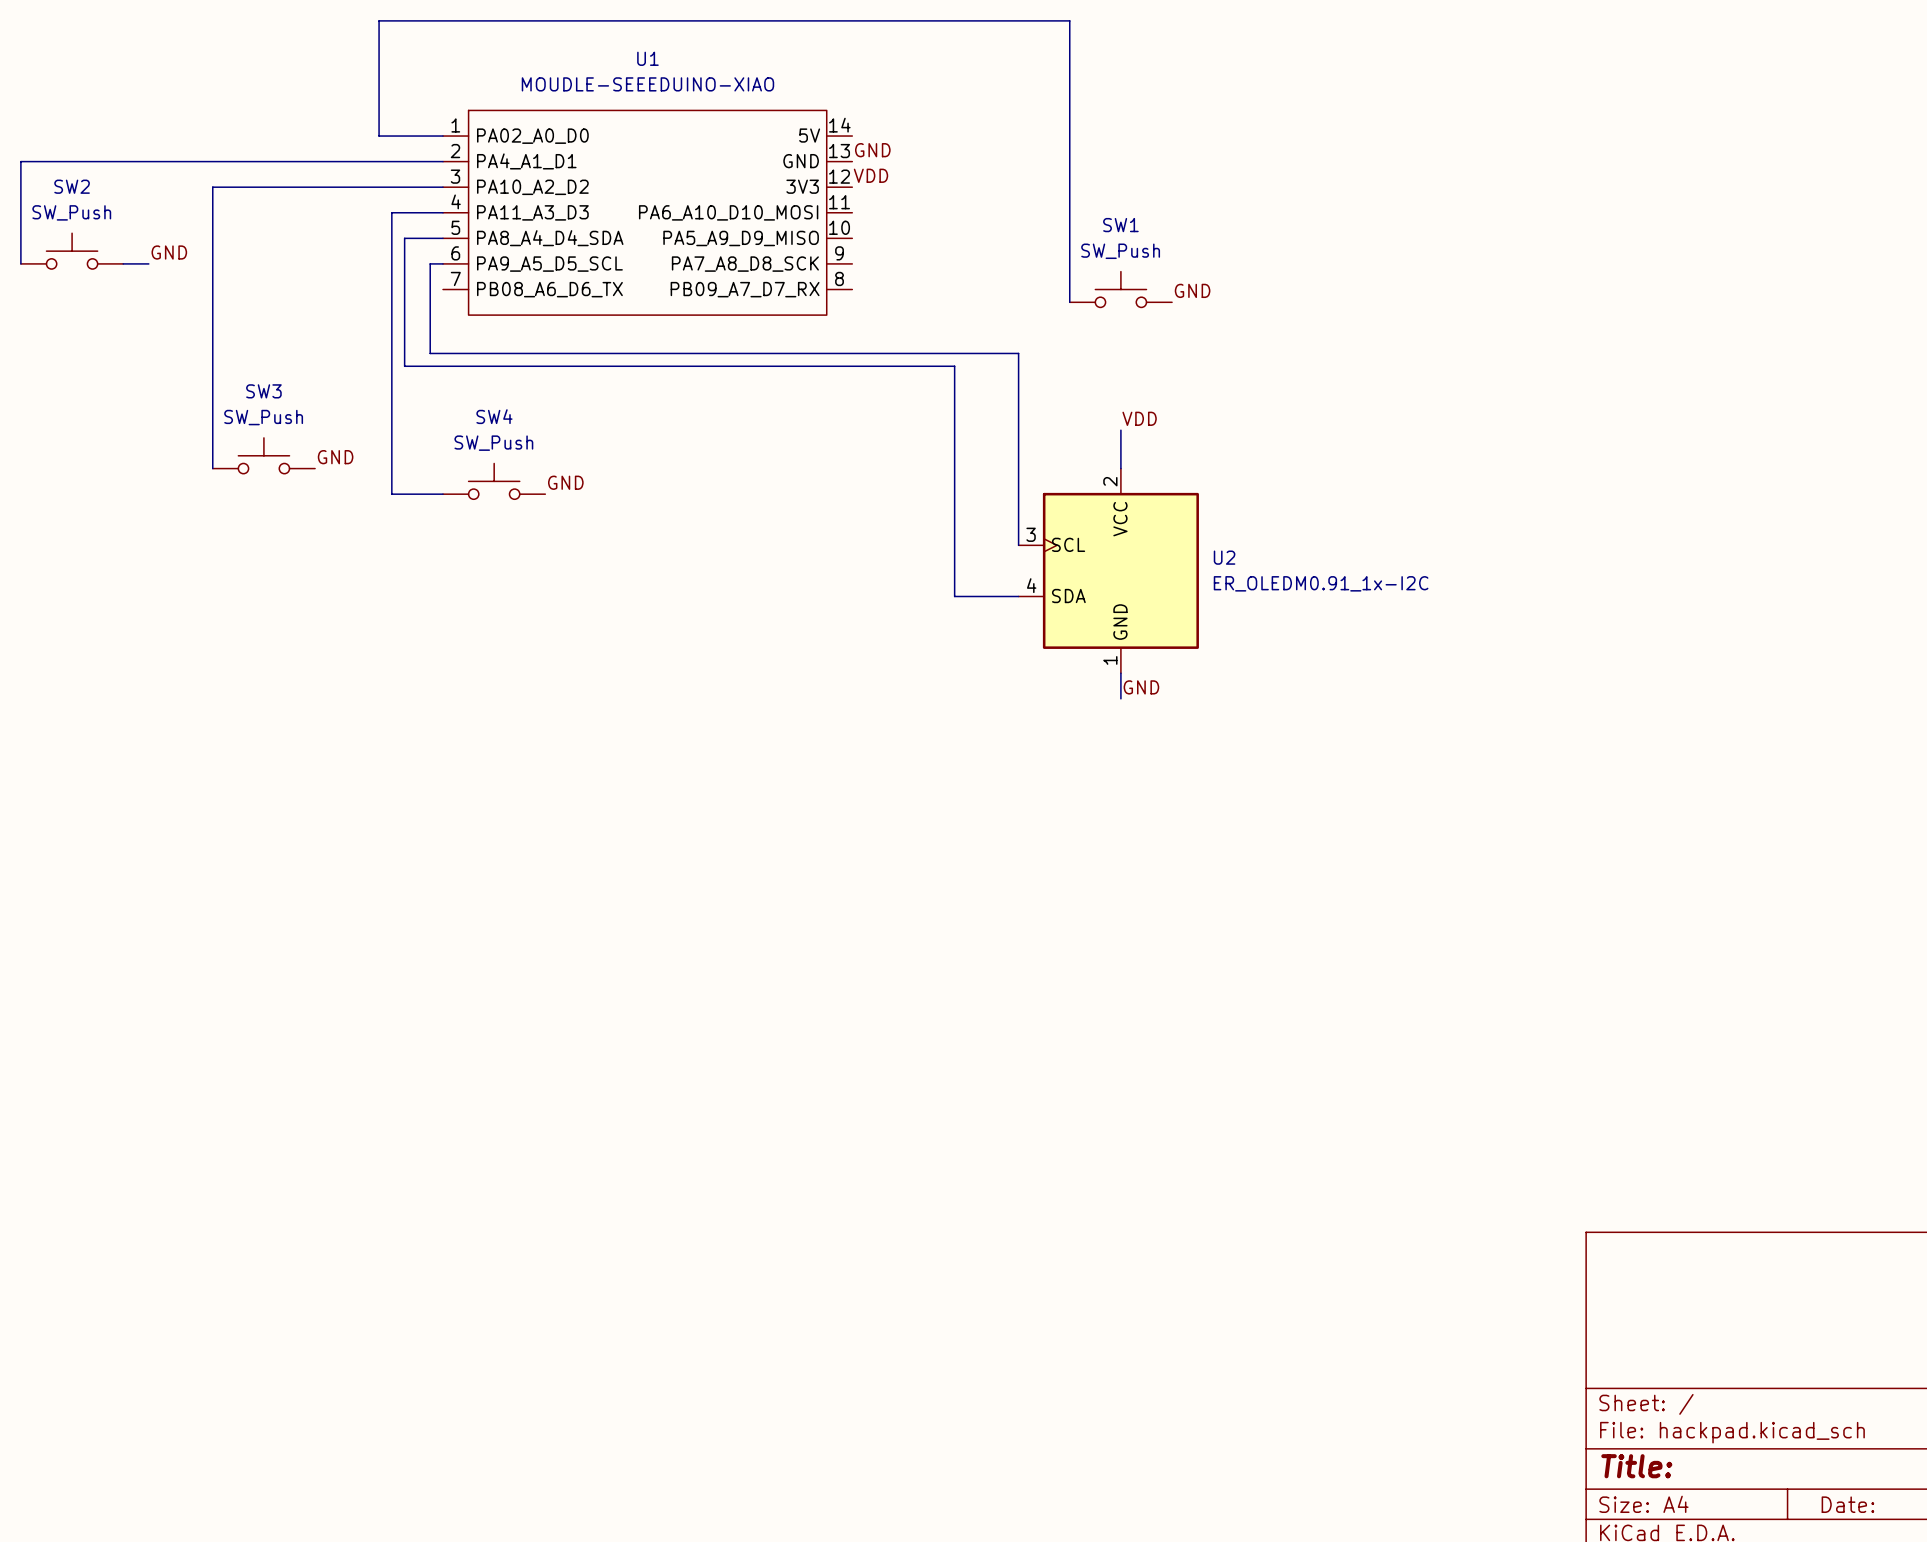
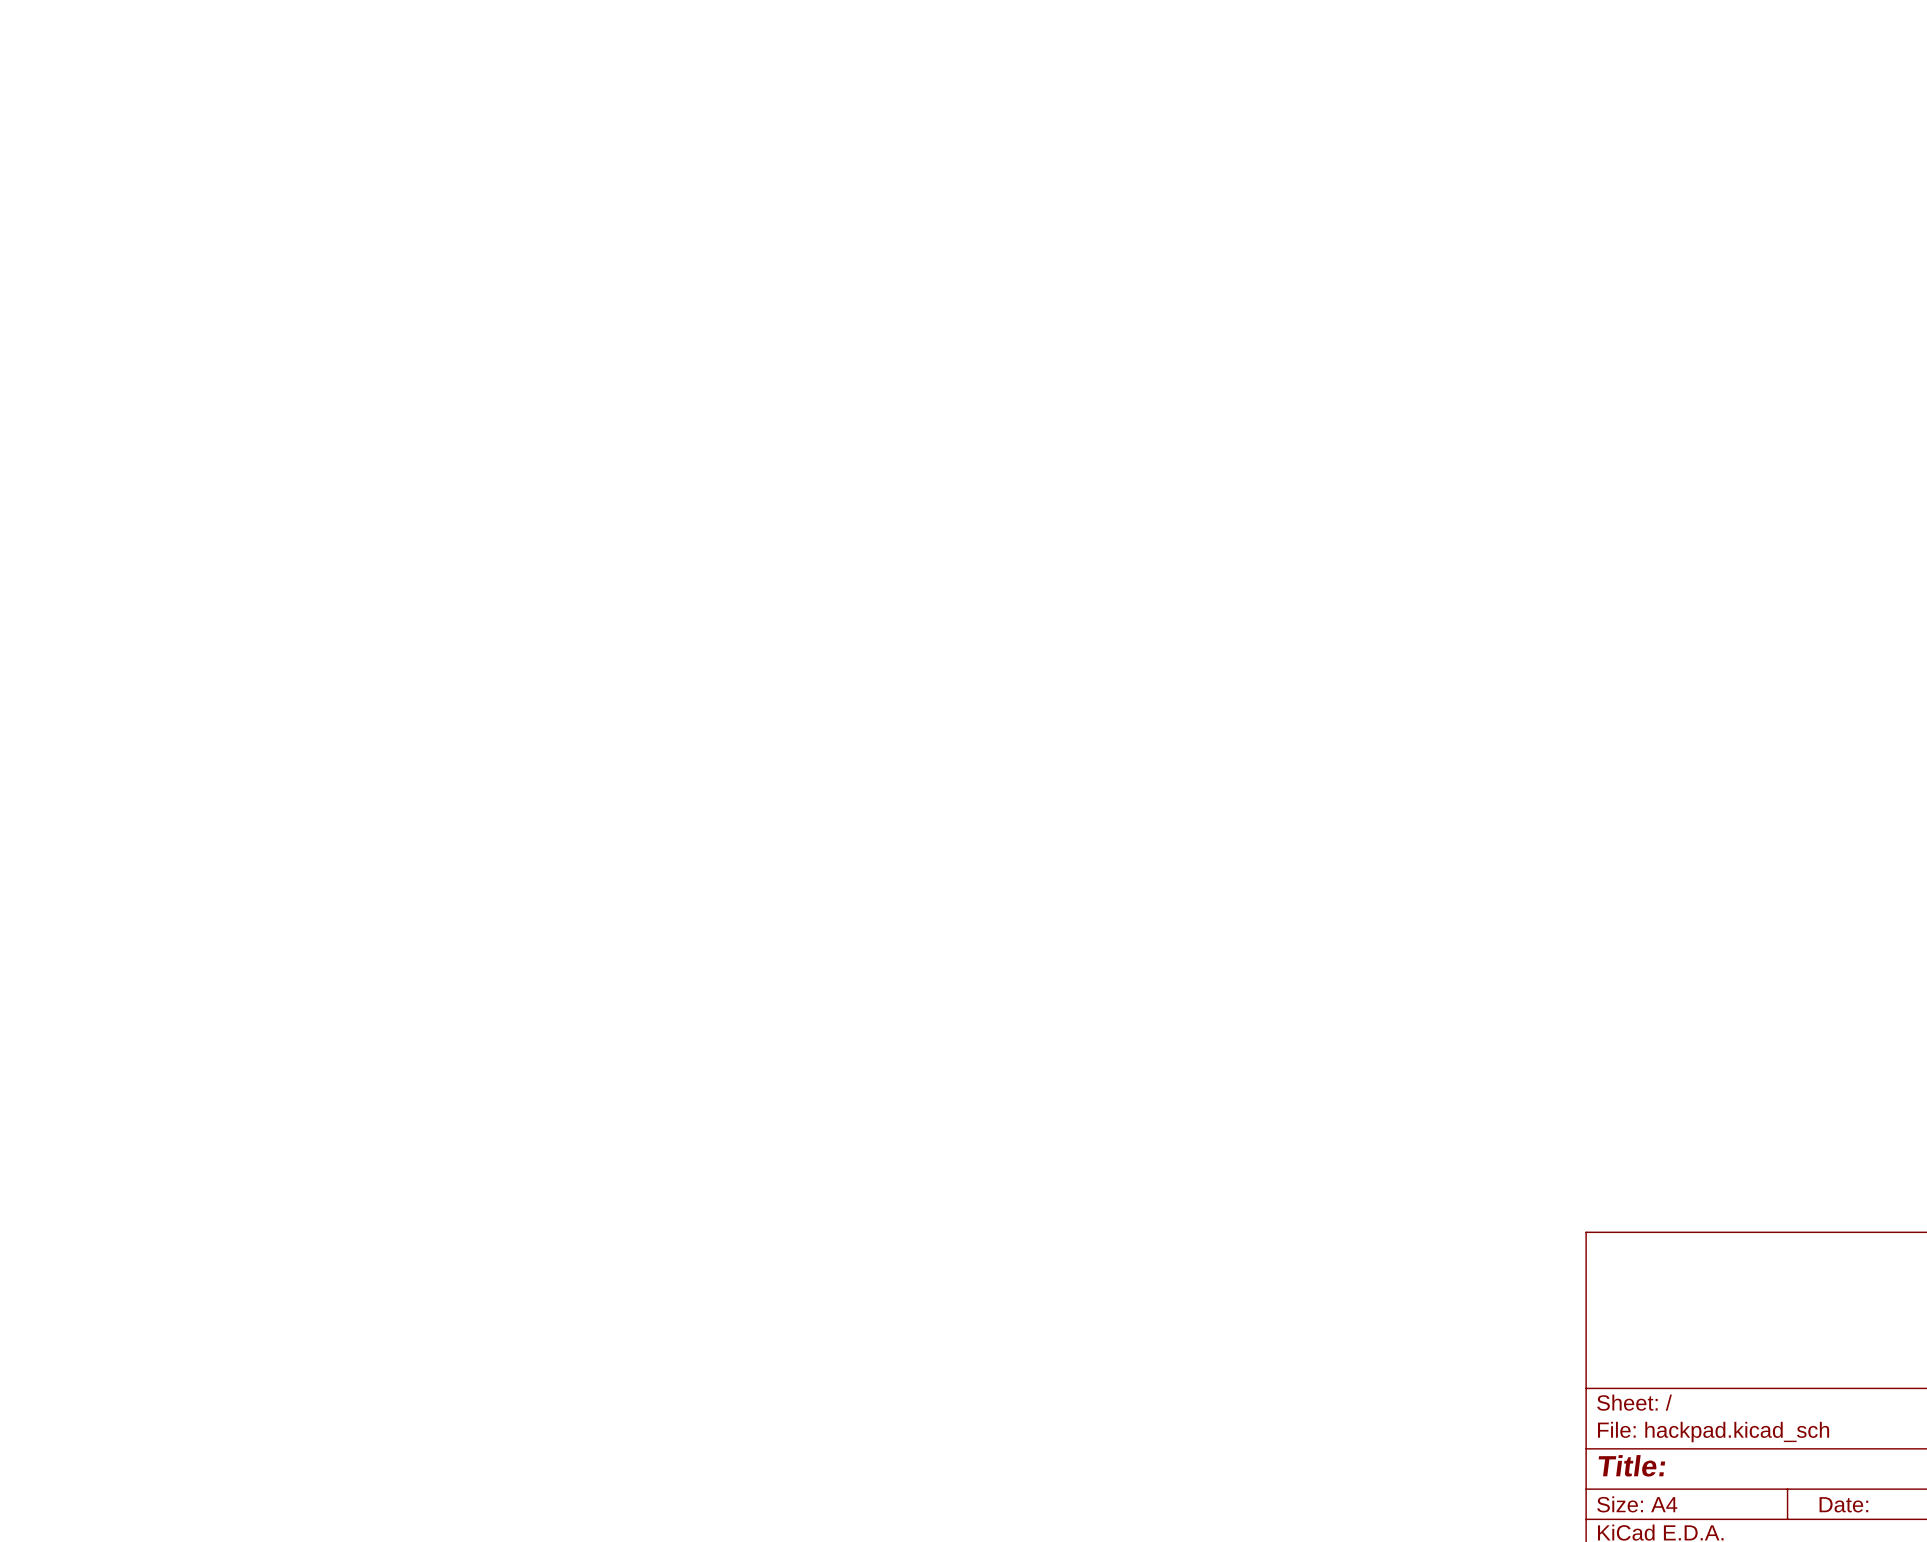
wire: (443, 136) (379, 136) (379, 20) (1069, 20) (1069, 302) -> none
label: GND (872, 150) -> none
wire: (443, 161) (20, 161) (20, 263) -> none
label: VDD (870, 175) -> none
wire: (443, 187) (212, 187) (212, 468) -> none
wire: (443, 212) (391, 212) (391, 494) (443, 494) -> none
U1: MOUDLE-SEEEDUINO-XIAO (647, 212) -> none
wire: (443, 238) (404, 238) (404, 366) (954, 366) (954, 596) (1018, 596) -> none
SW2: SW_Push (72, 251) -> none
label: GND (169, 252) -> none
wire: (123, 263) (148, 263) -> none
wire: (443, 263) (430, 263) (430, 353) (1018, 353) (1018, 545) -> none
SW1: SW_Push (1120, 289) -> none
label: GND (1192, 290) -> none
label: VDD (1139, 418) -> none
wire: (1120, 430) (1120, 468) -> none
SW3: SW_Push (263, 455) -> none
label: GND (335, 457) -> none
SW4: SW_Push (494, 481) -> none
label: GND (565, 482) -> none
U2: ER_OLEDM0.91_1x-I2C (1108, 570) -> none
wire: (1120, 673) (1120, 698) -> none
label: GND (1141, 687) -> none

